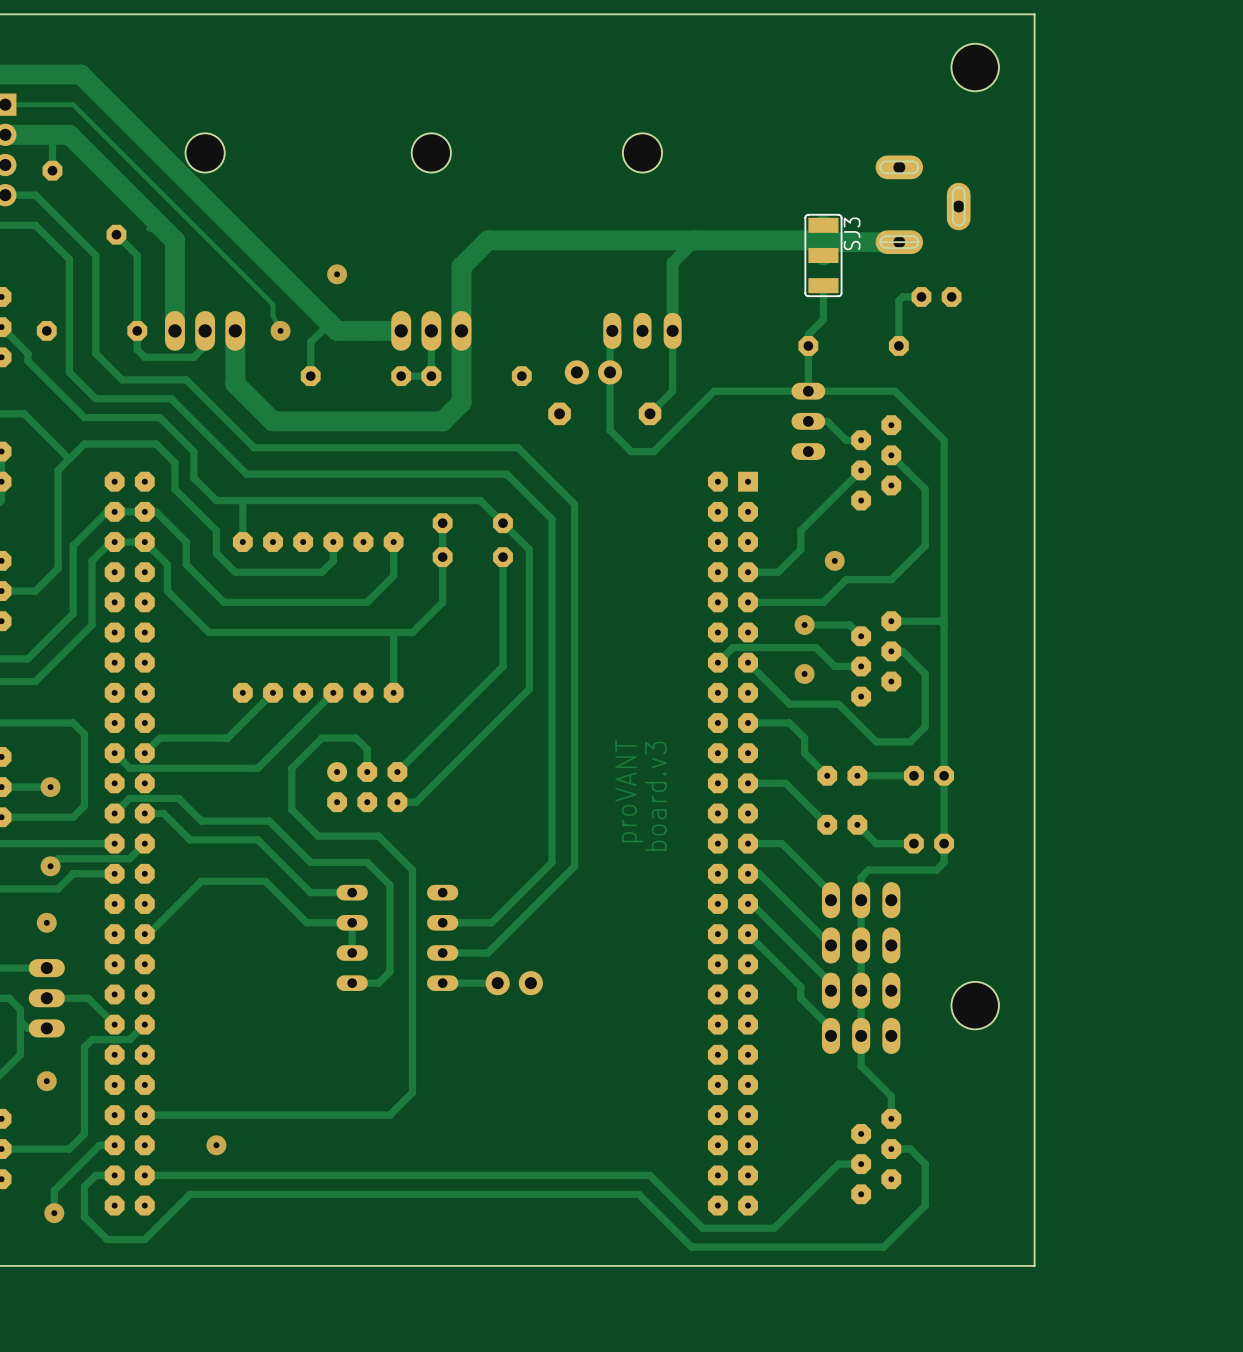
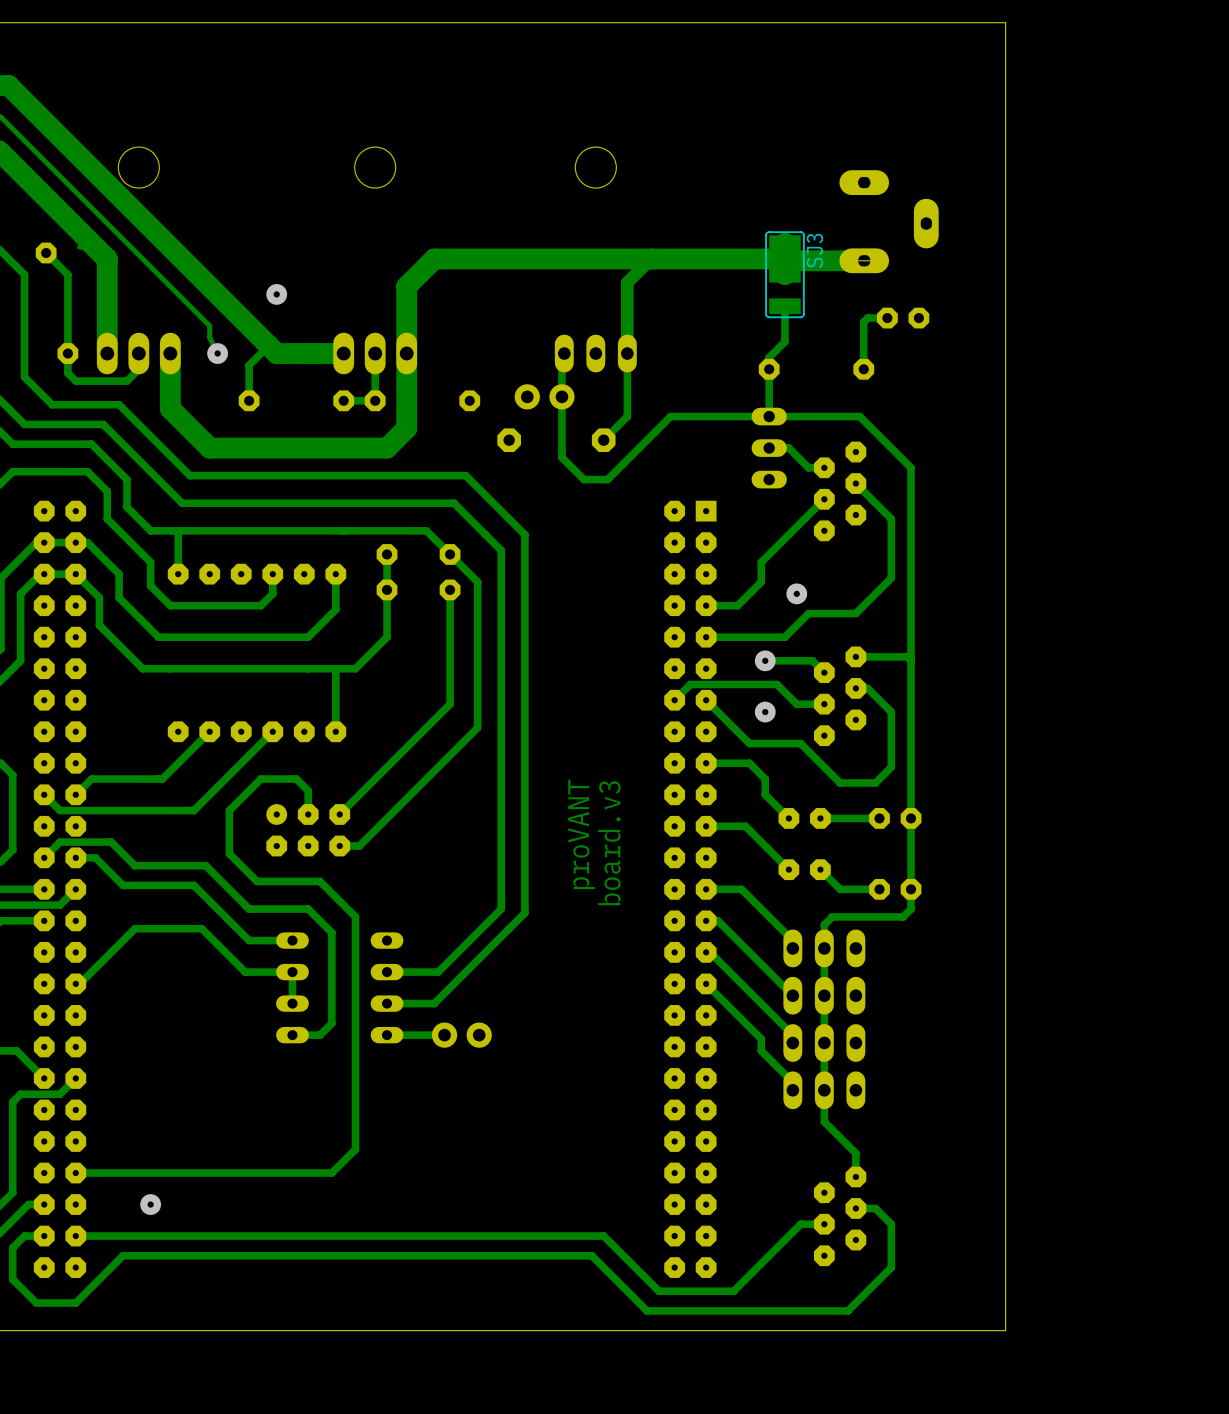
hole: (975, 67) -> none
hole: (975, 1005) -> none

